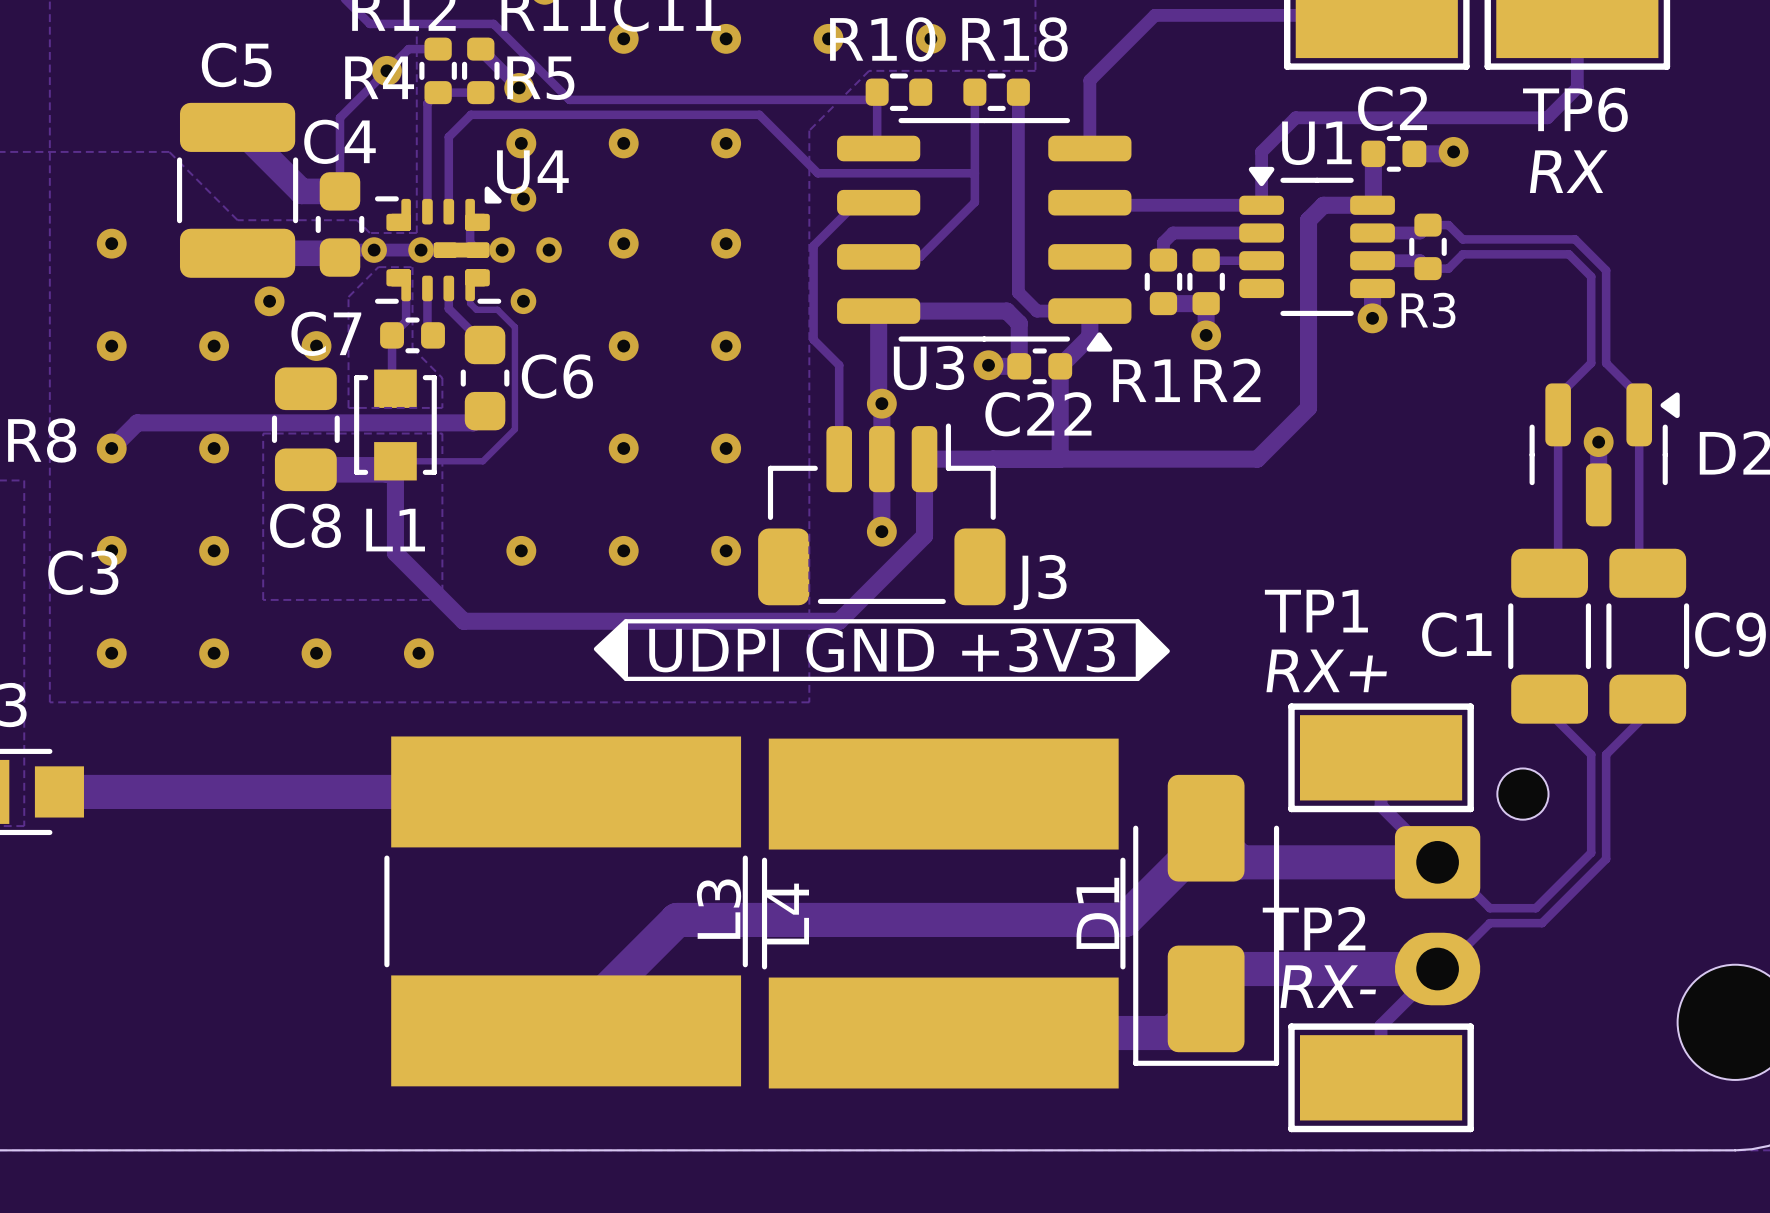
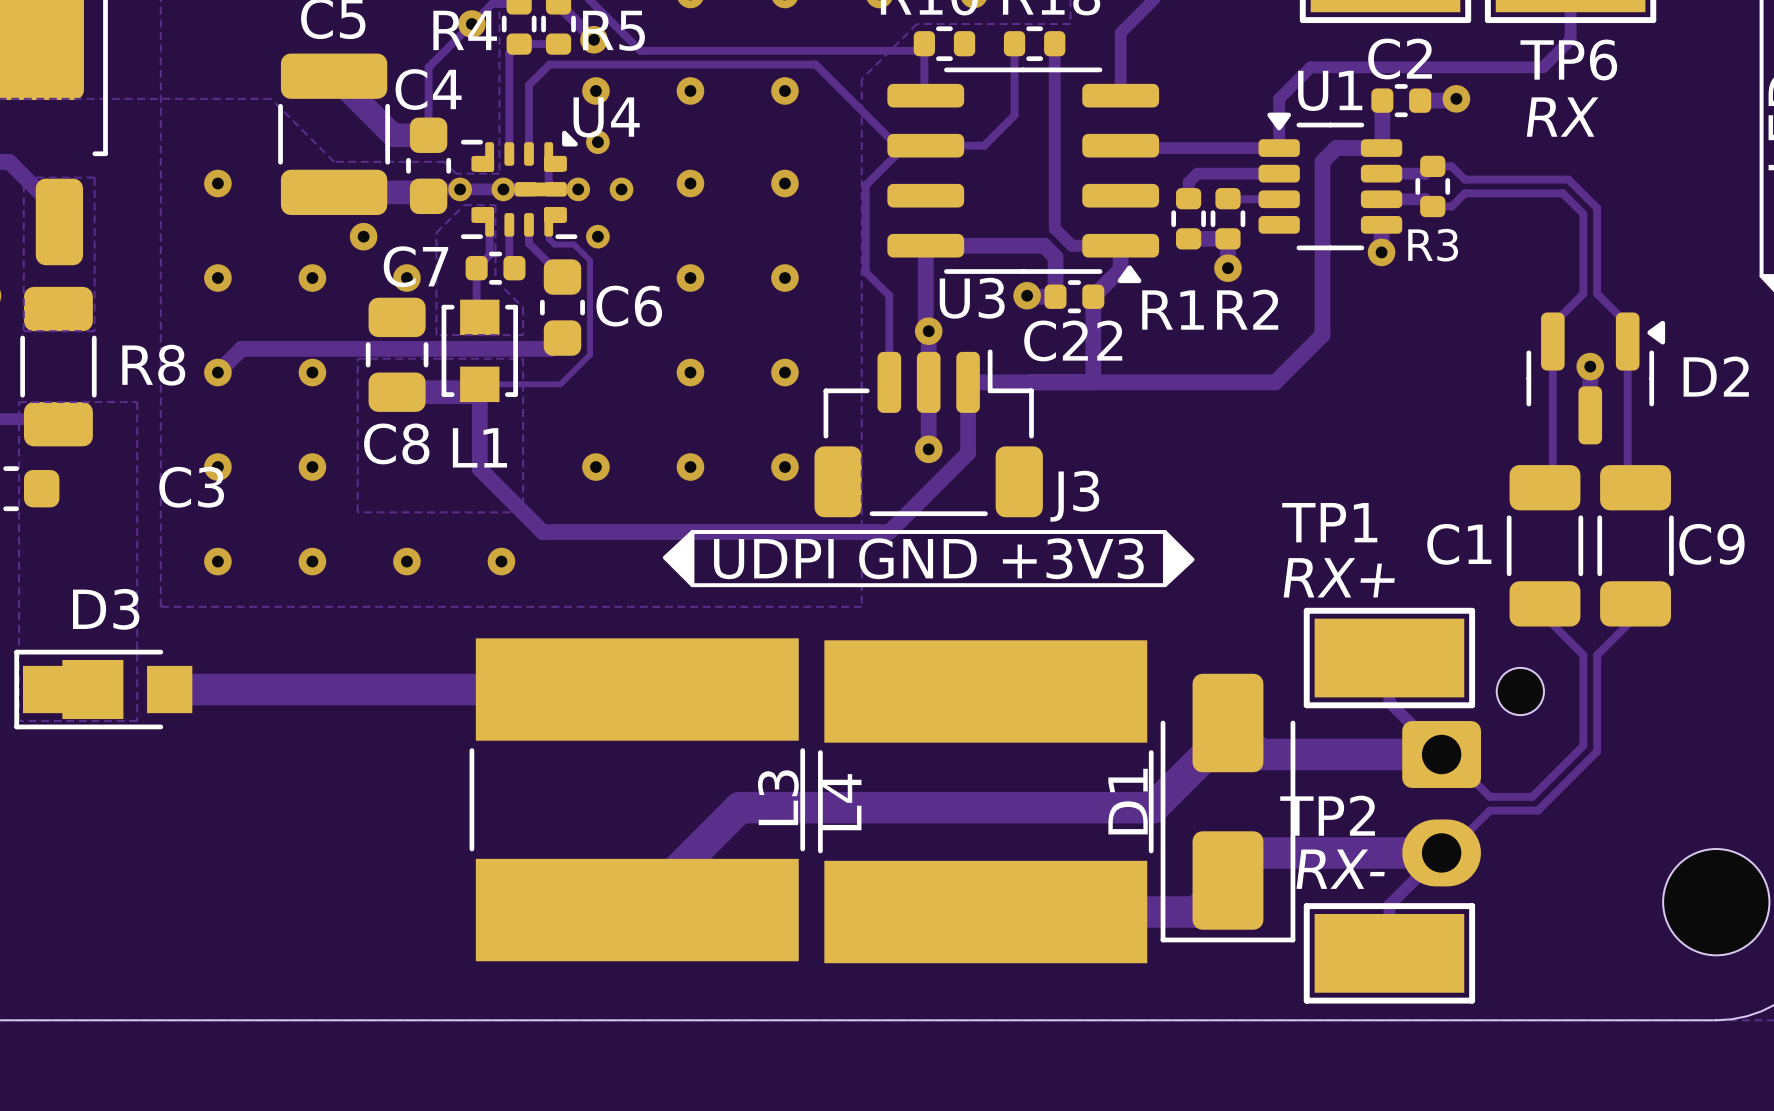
track: (974, 169) (974, 202) (920, 256) (878, 256) -> (1014, 115) (984, 145) (925, 145)
track: (817, 173) (974, 173) -> (869, 118) (896, 145)

